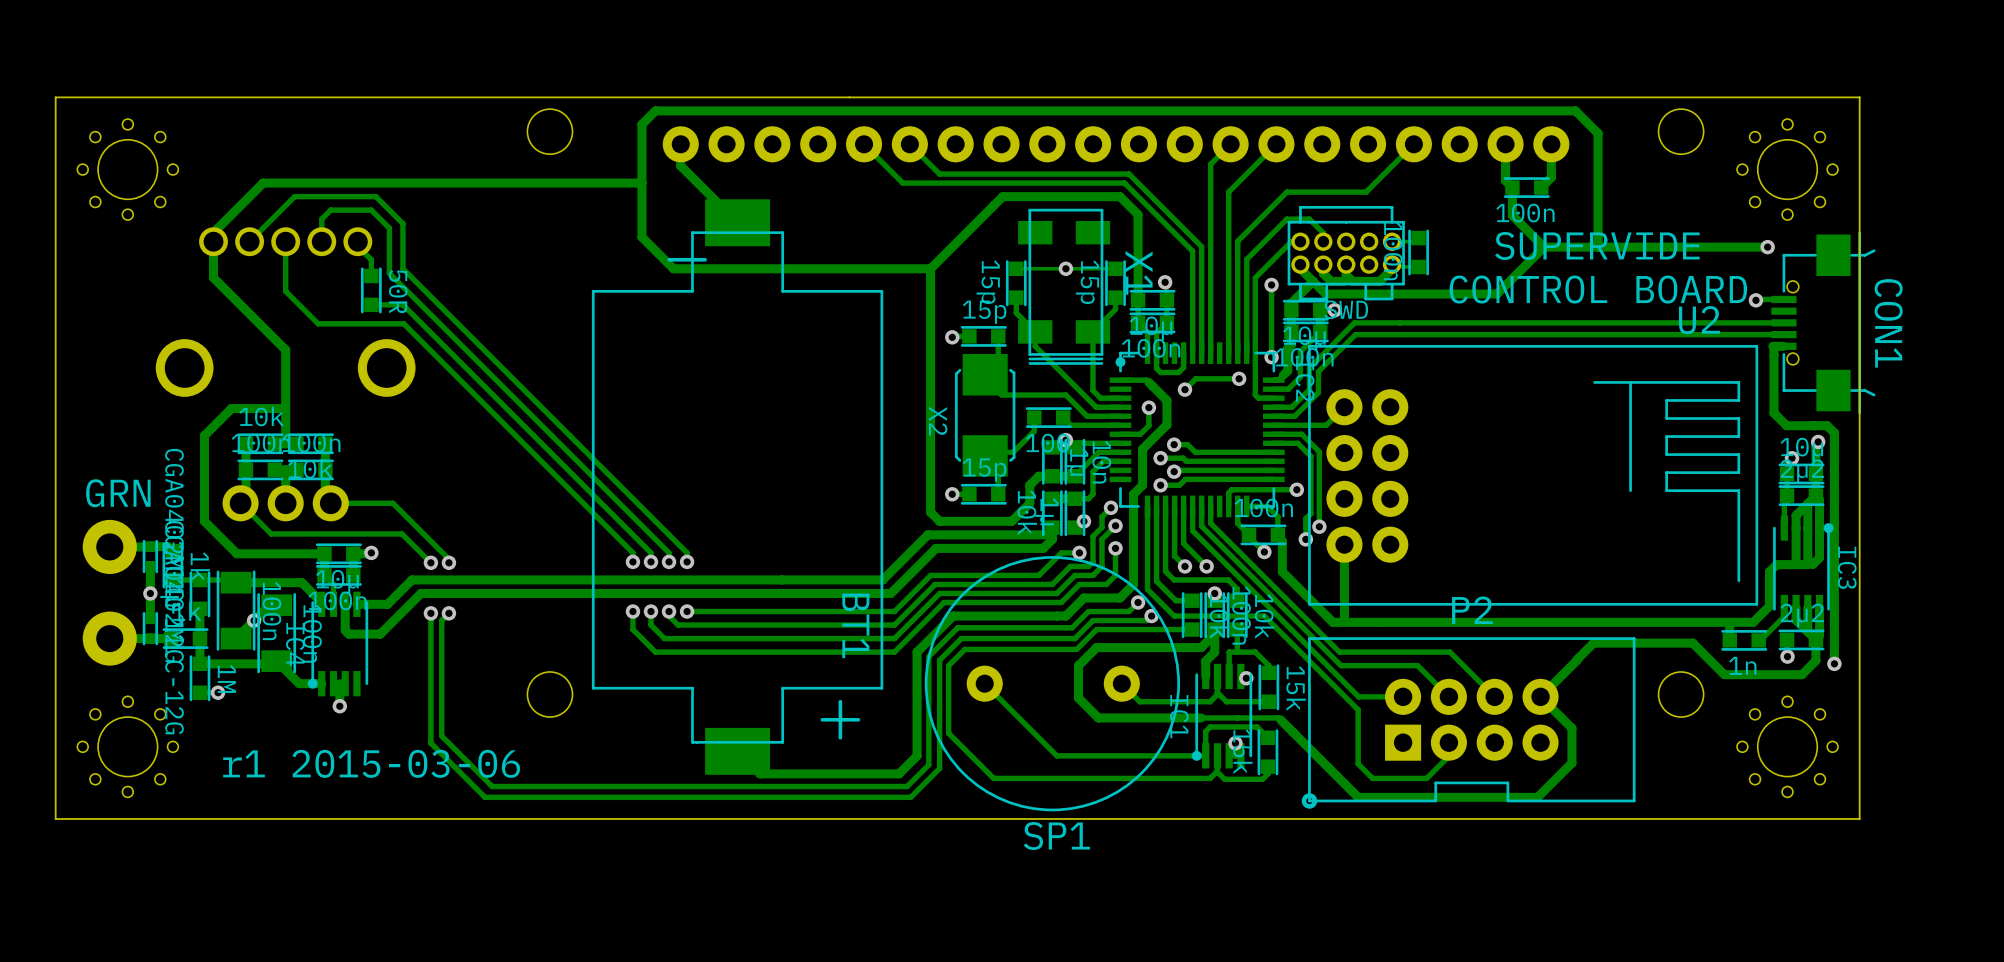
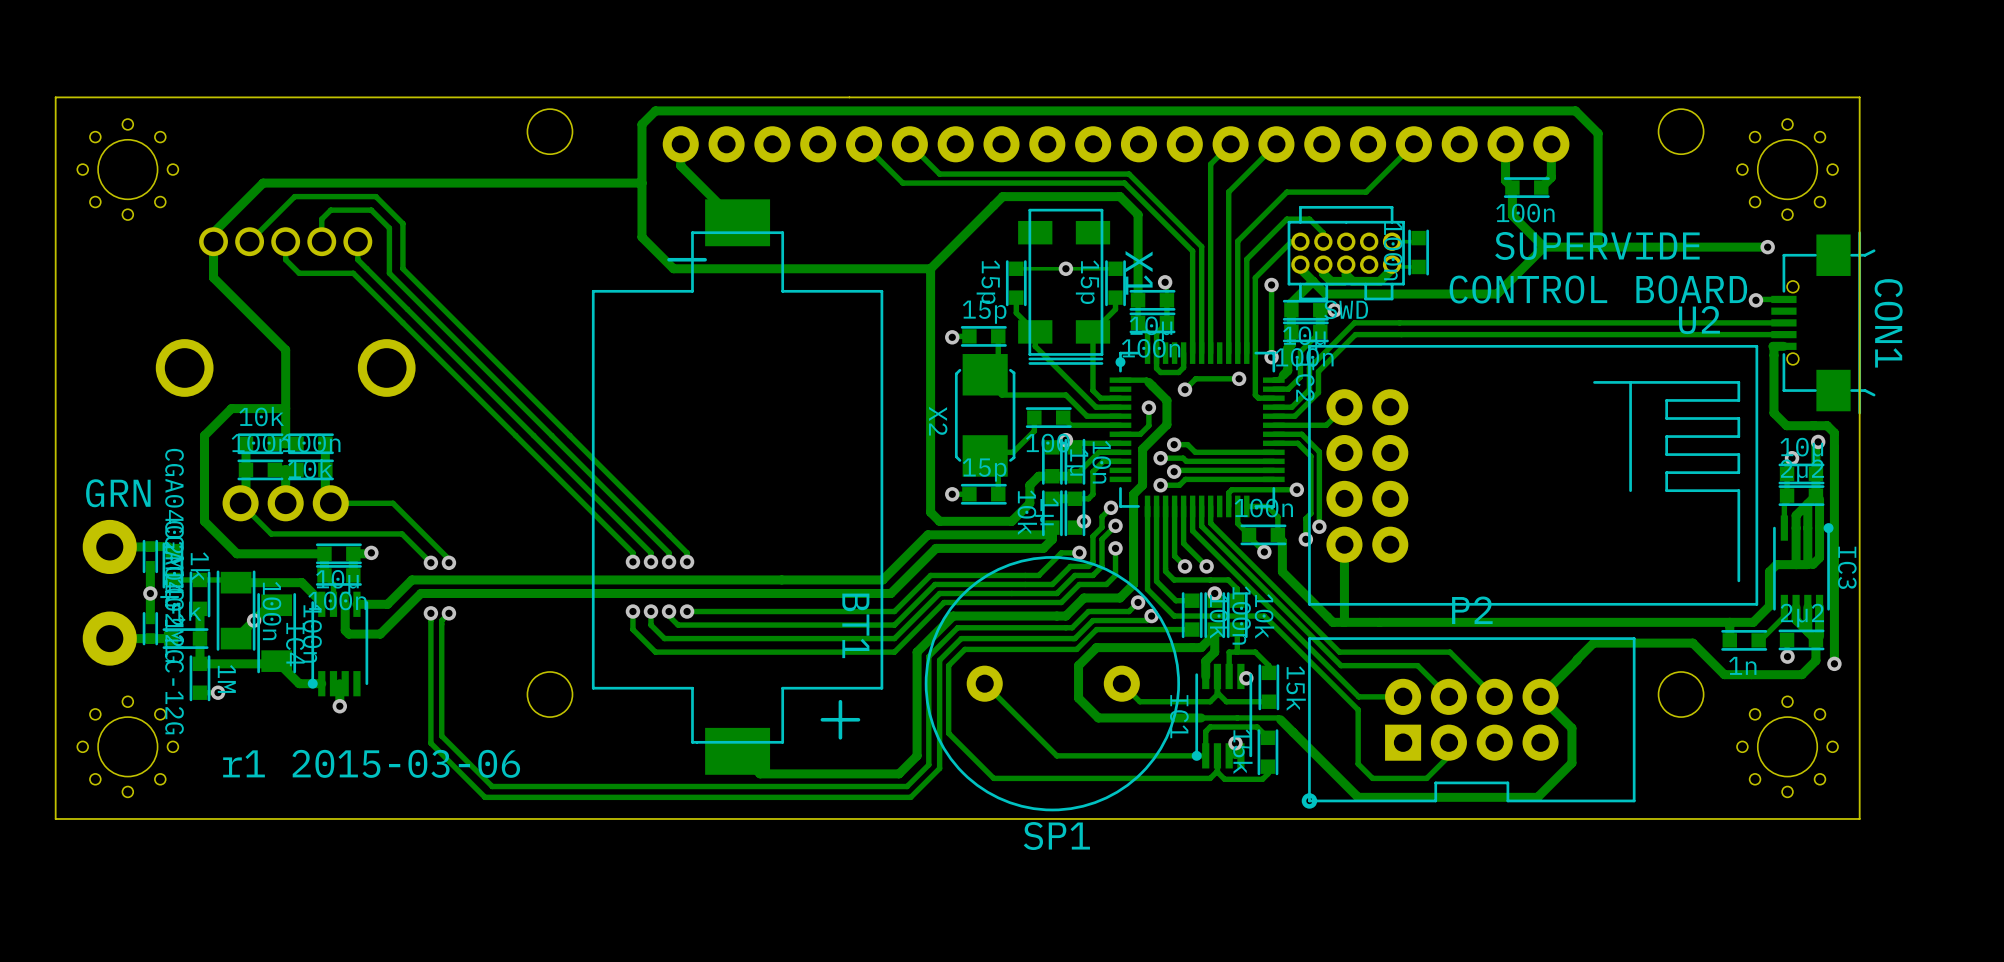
track: (357, 246) (371, 259) (371, 275) -> (357, 246) (357, 259) (402, 304)
track: (285, 259) (285, 291) (318, 323) (403, 323) -> (285, 259) (299, 273) (353, 273) (403, 323)
part: 50R (371, 290) -> none
track: (402, 304) (371, 304) -> none

